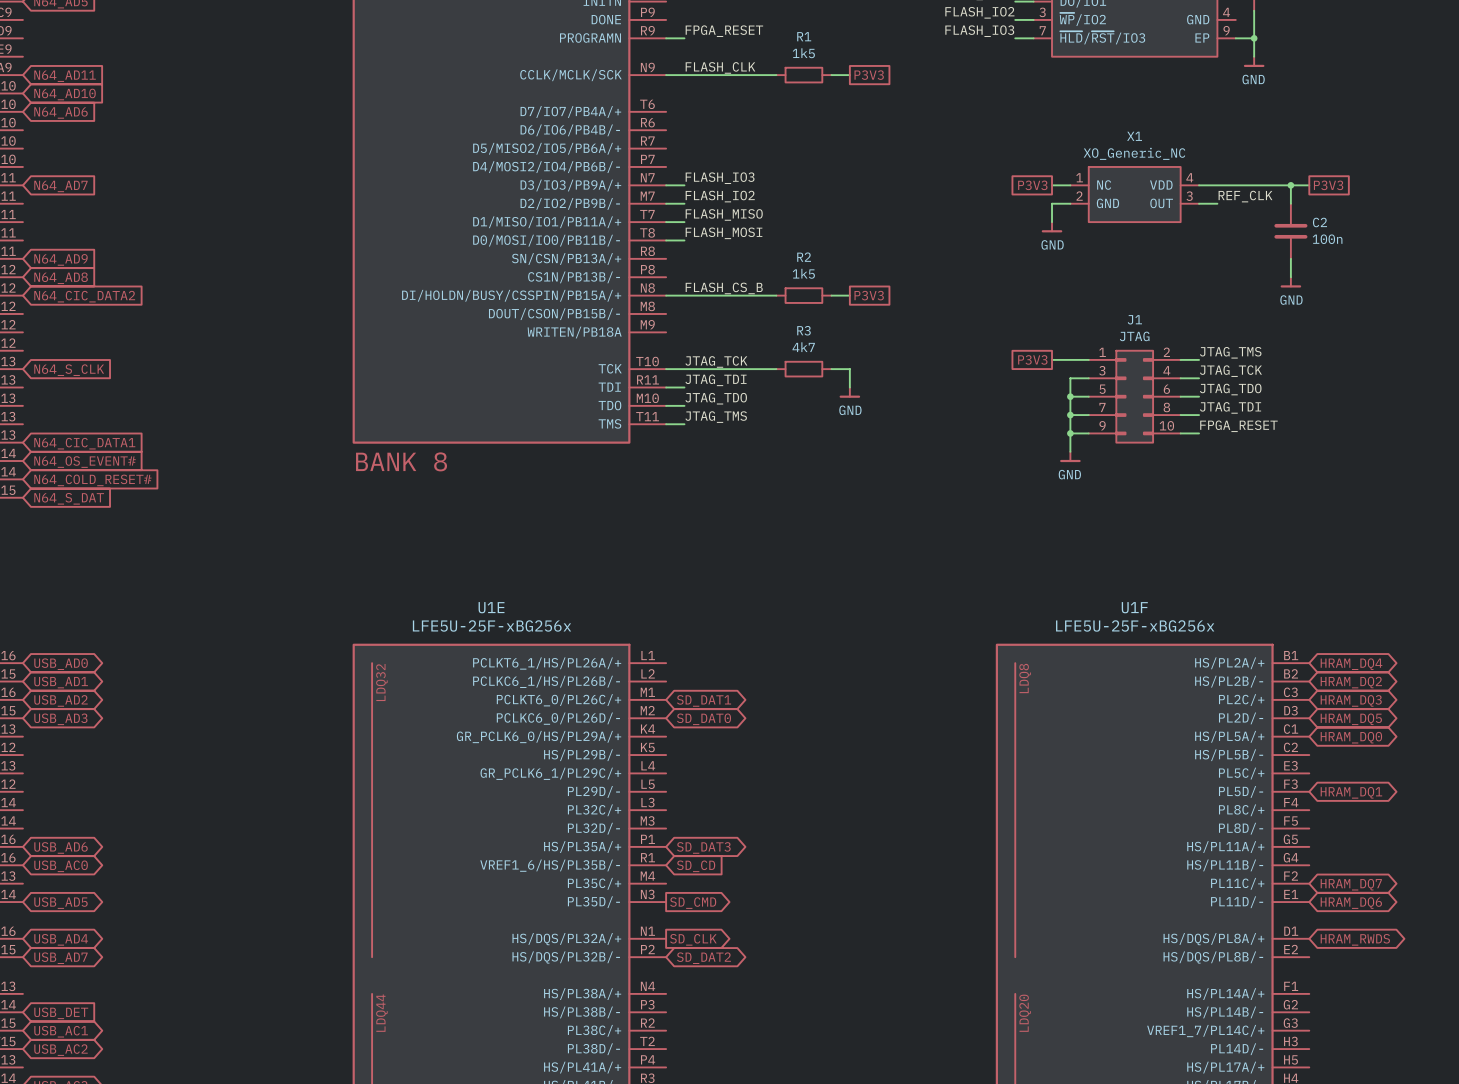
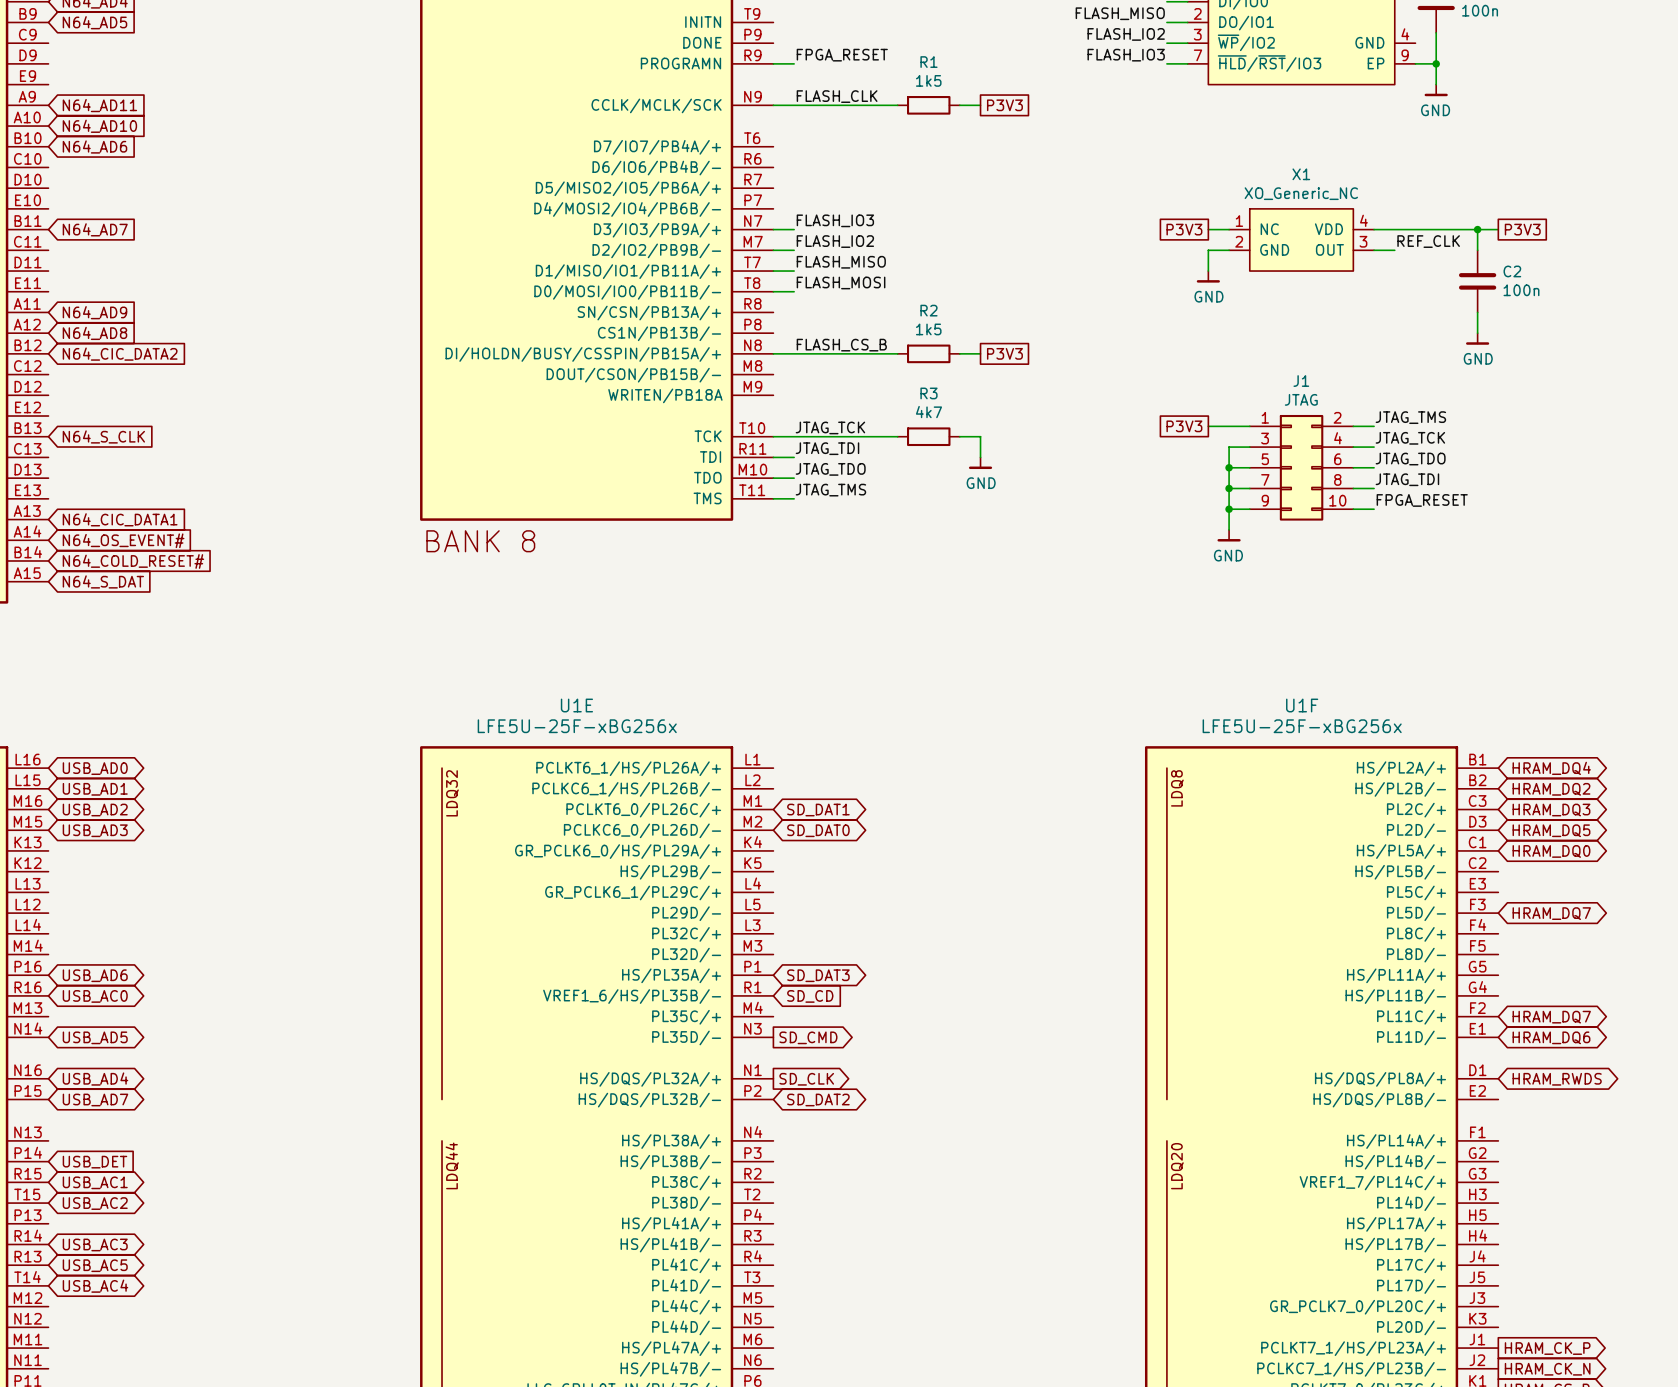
global label: HRAM_DQ1 (1351, 792) -> HRAM_DQ7 (1551, 913)

